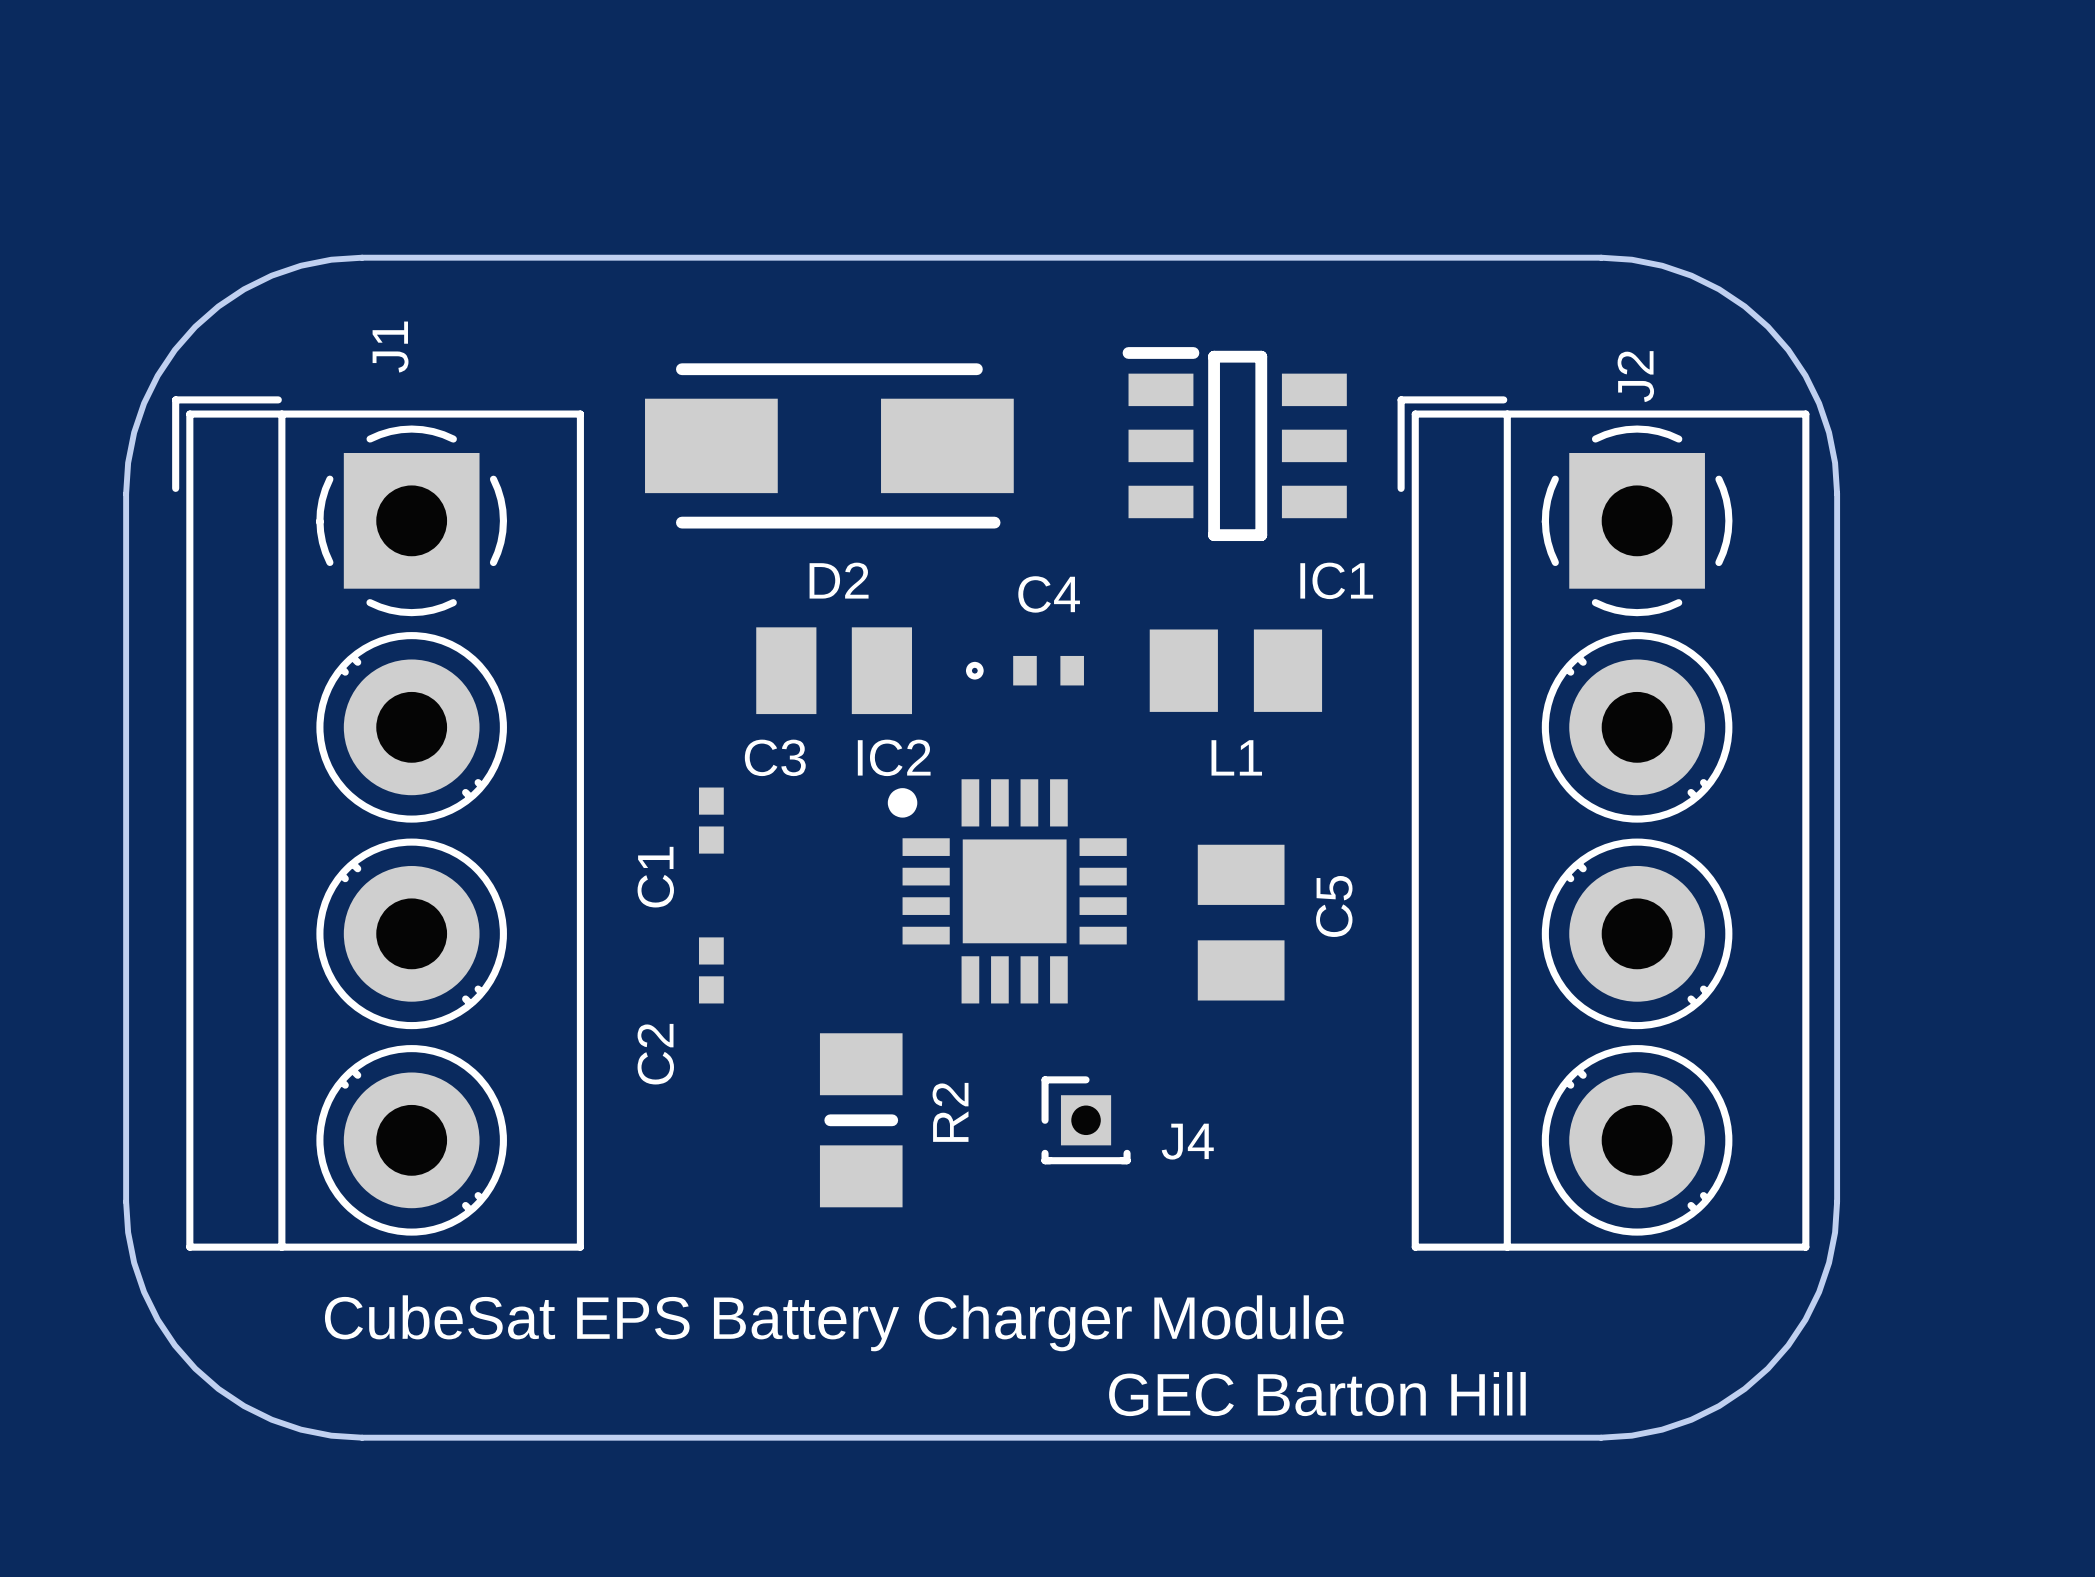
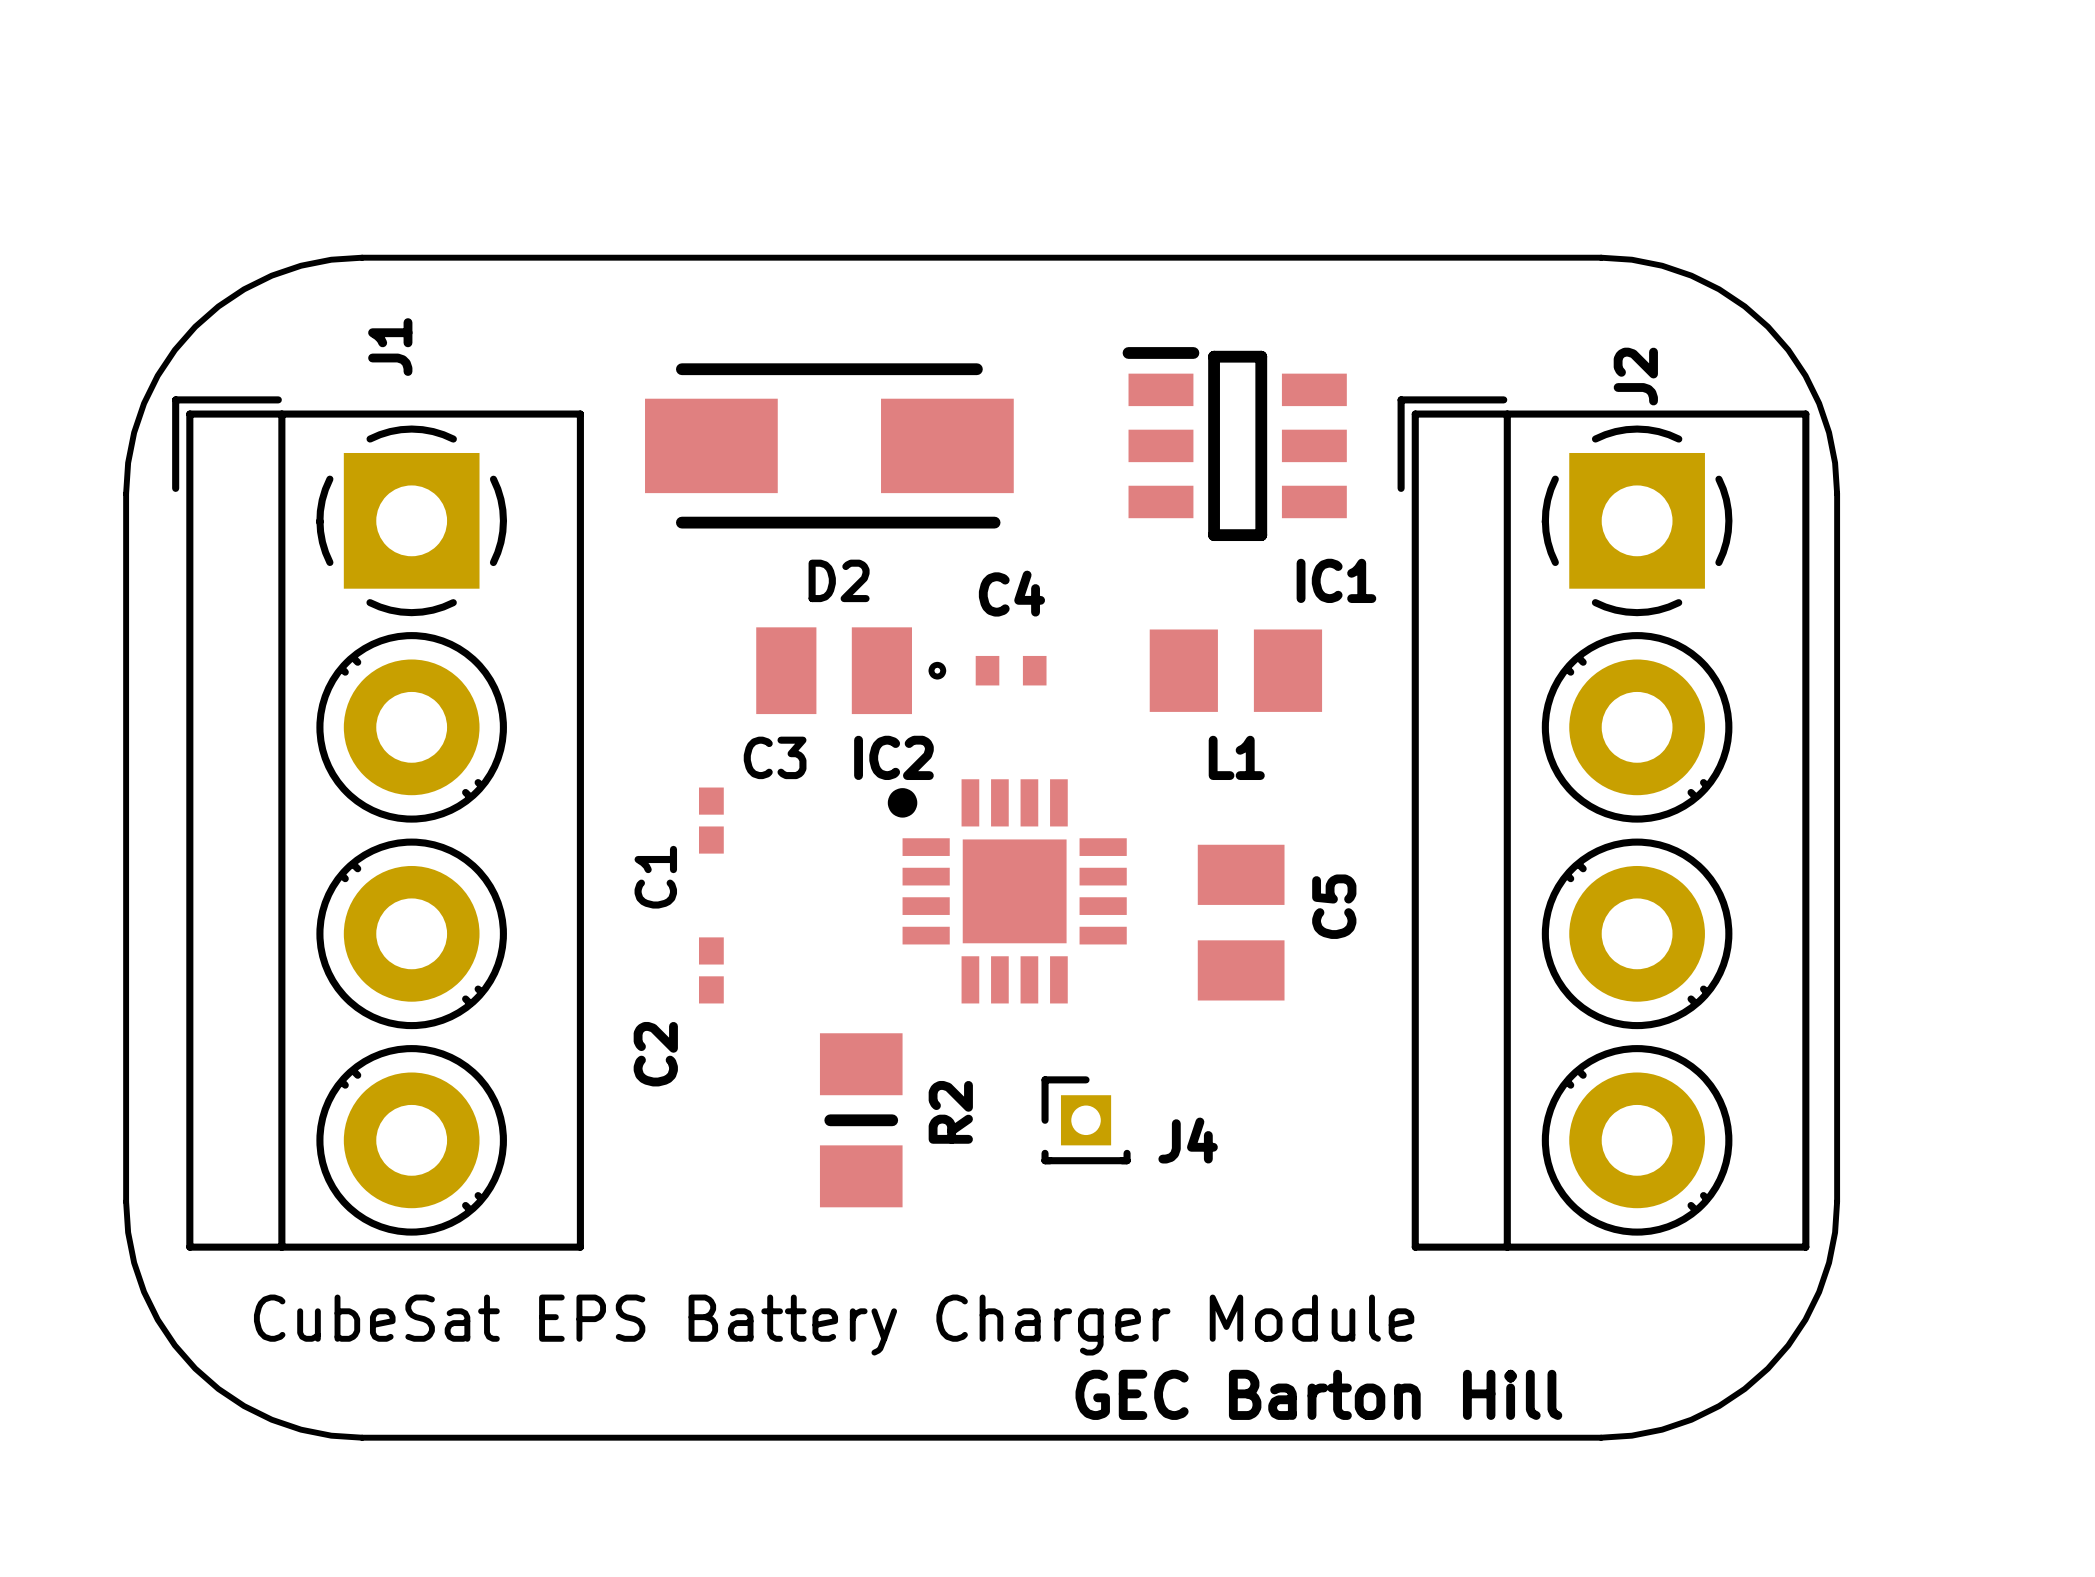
C4 position: (1024, 670) -> (987, 670)

